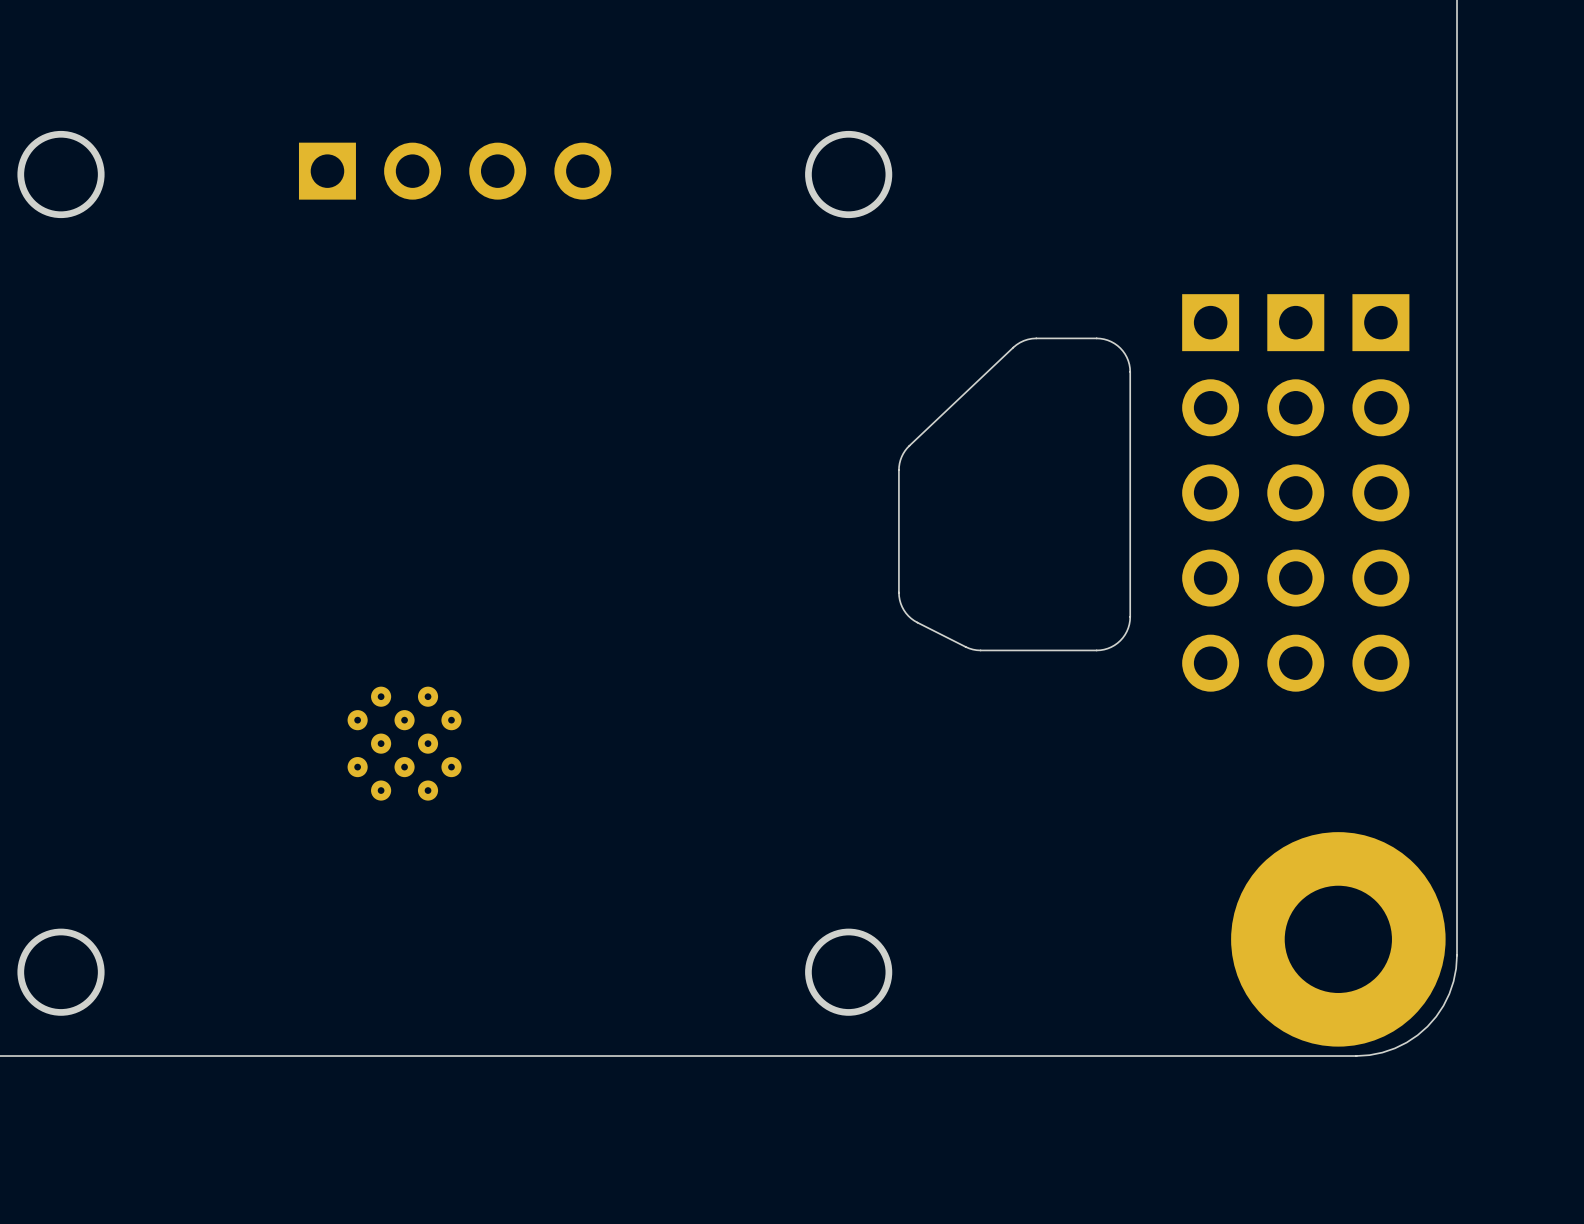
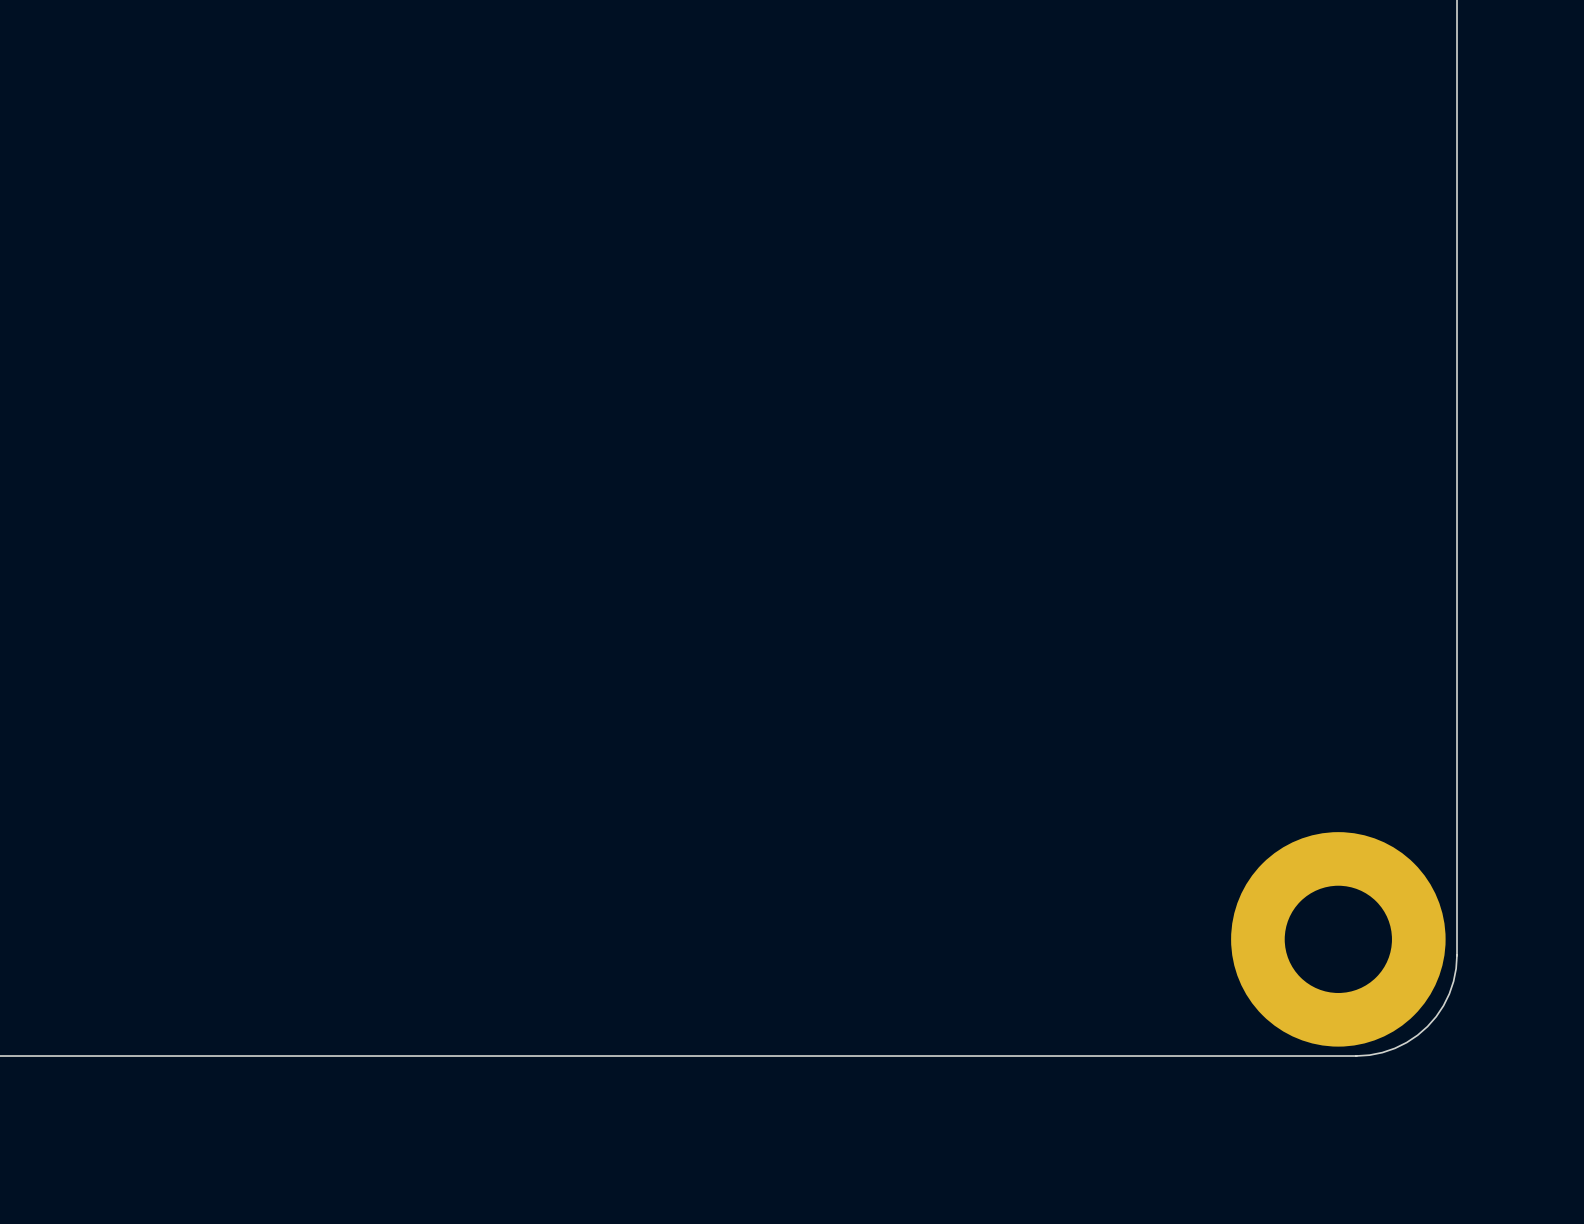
round board edge: [17, 130, 105, 219] -> none
round board edge: [805, 130, 893, 219] -> none
part: (455, 171) -> none
board edge: (1096, 338) (1036, 338) (1020, 342) (904, 450) (900, 460) (898, 470) (898, 592) (903, 610) (914, 620) (965, 646) (976, 650) (1100, 650) (1114, 645) (1125, 634) (1130, 616) (1129, 368) (1126, 357) (1120, 348) (1111, 341) (1096, 338) -> none
part: (1210, 492) -> none
part: (1295, 492) -> none
part: (1380, 492) -> none
part: (404, 743) -> none
round board edge: [17, 928, 105, 1016] -> none
round board edge: [805, 928, 893, 1016] -> none

